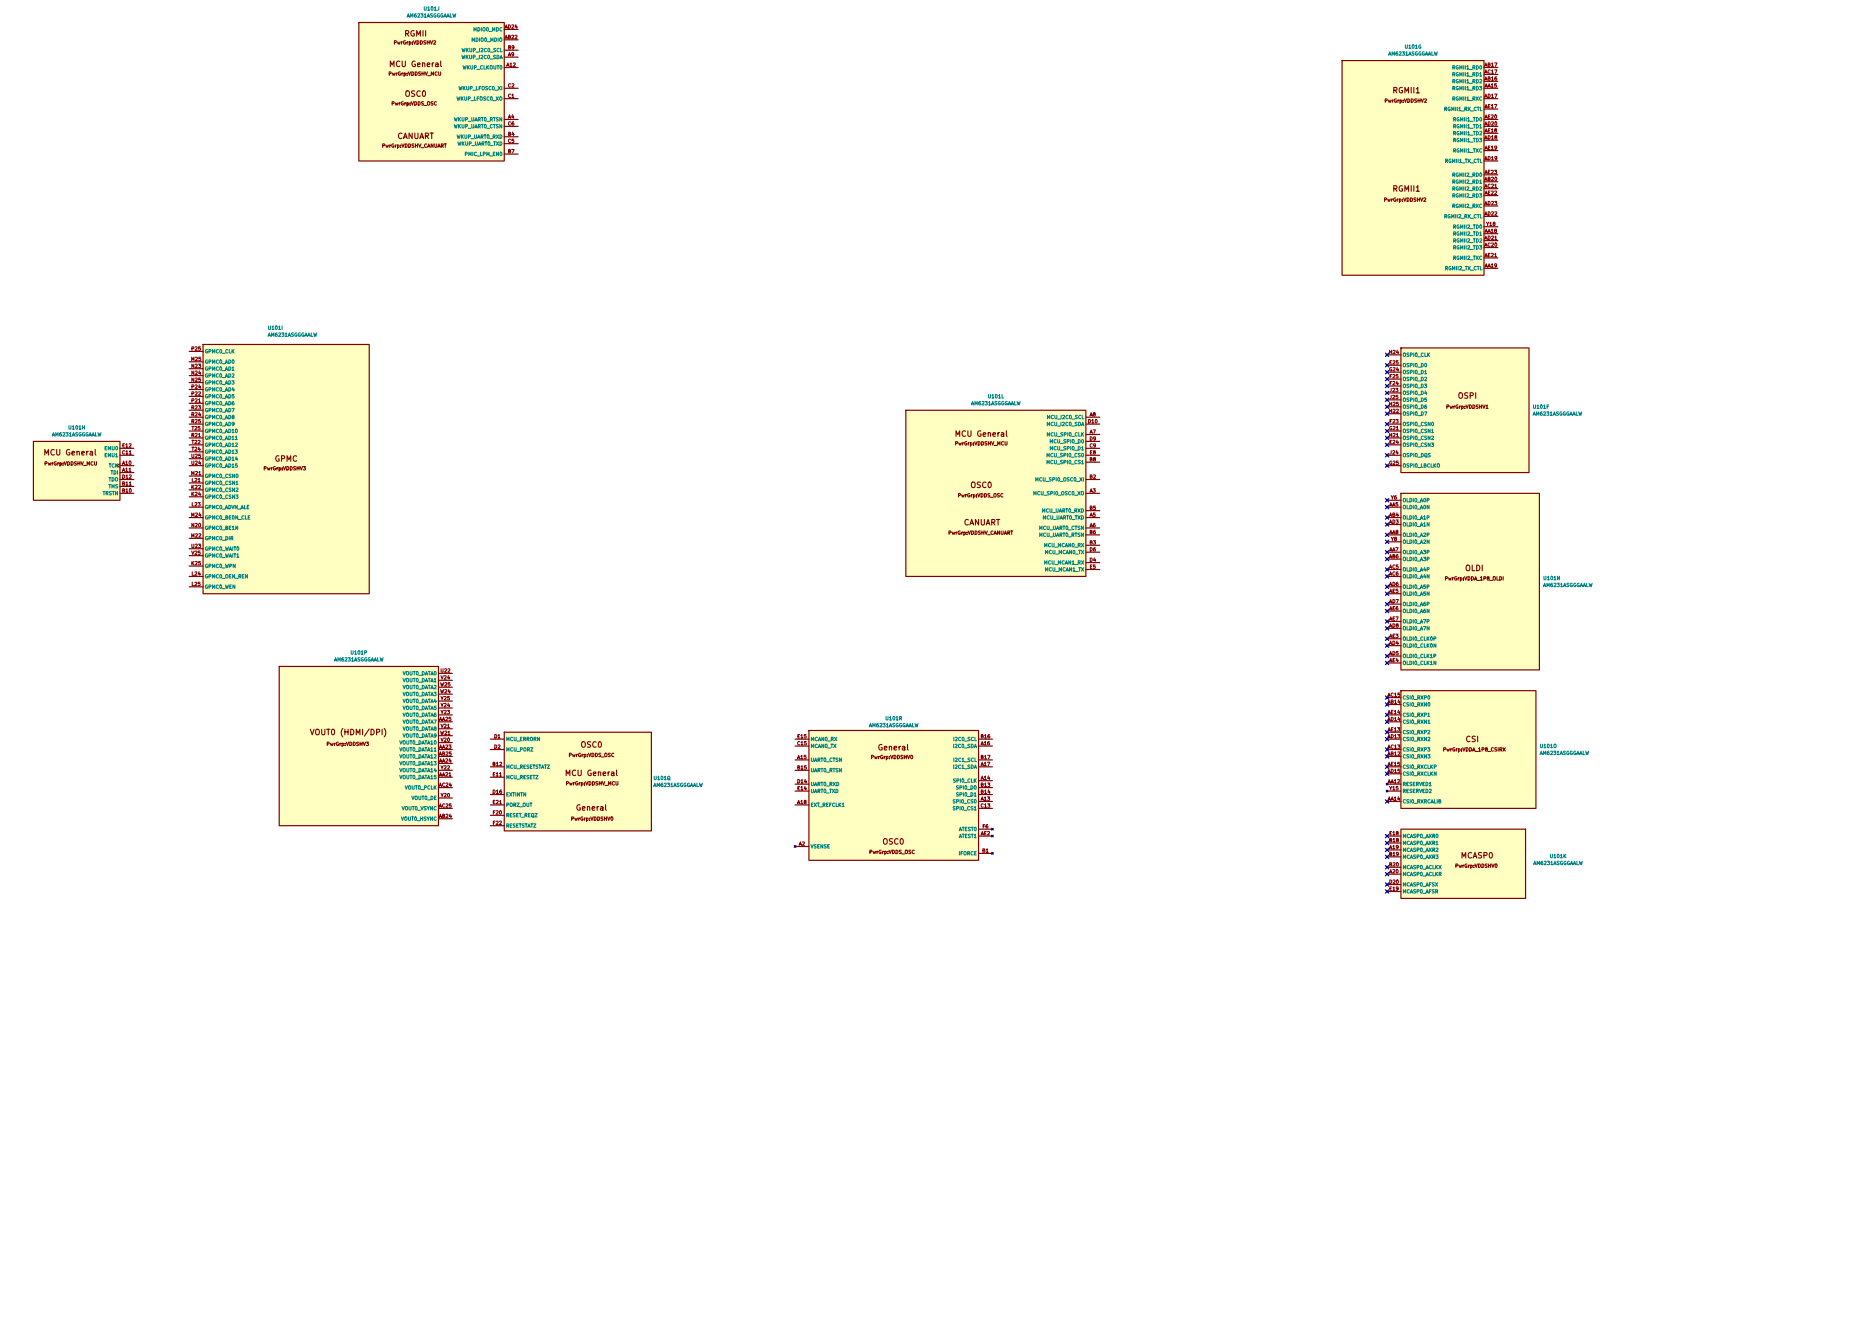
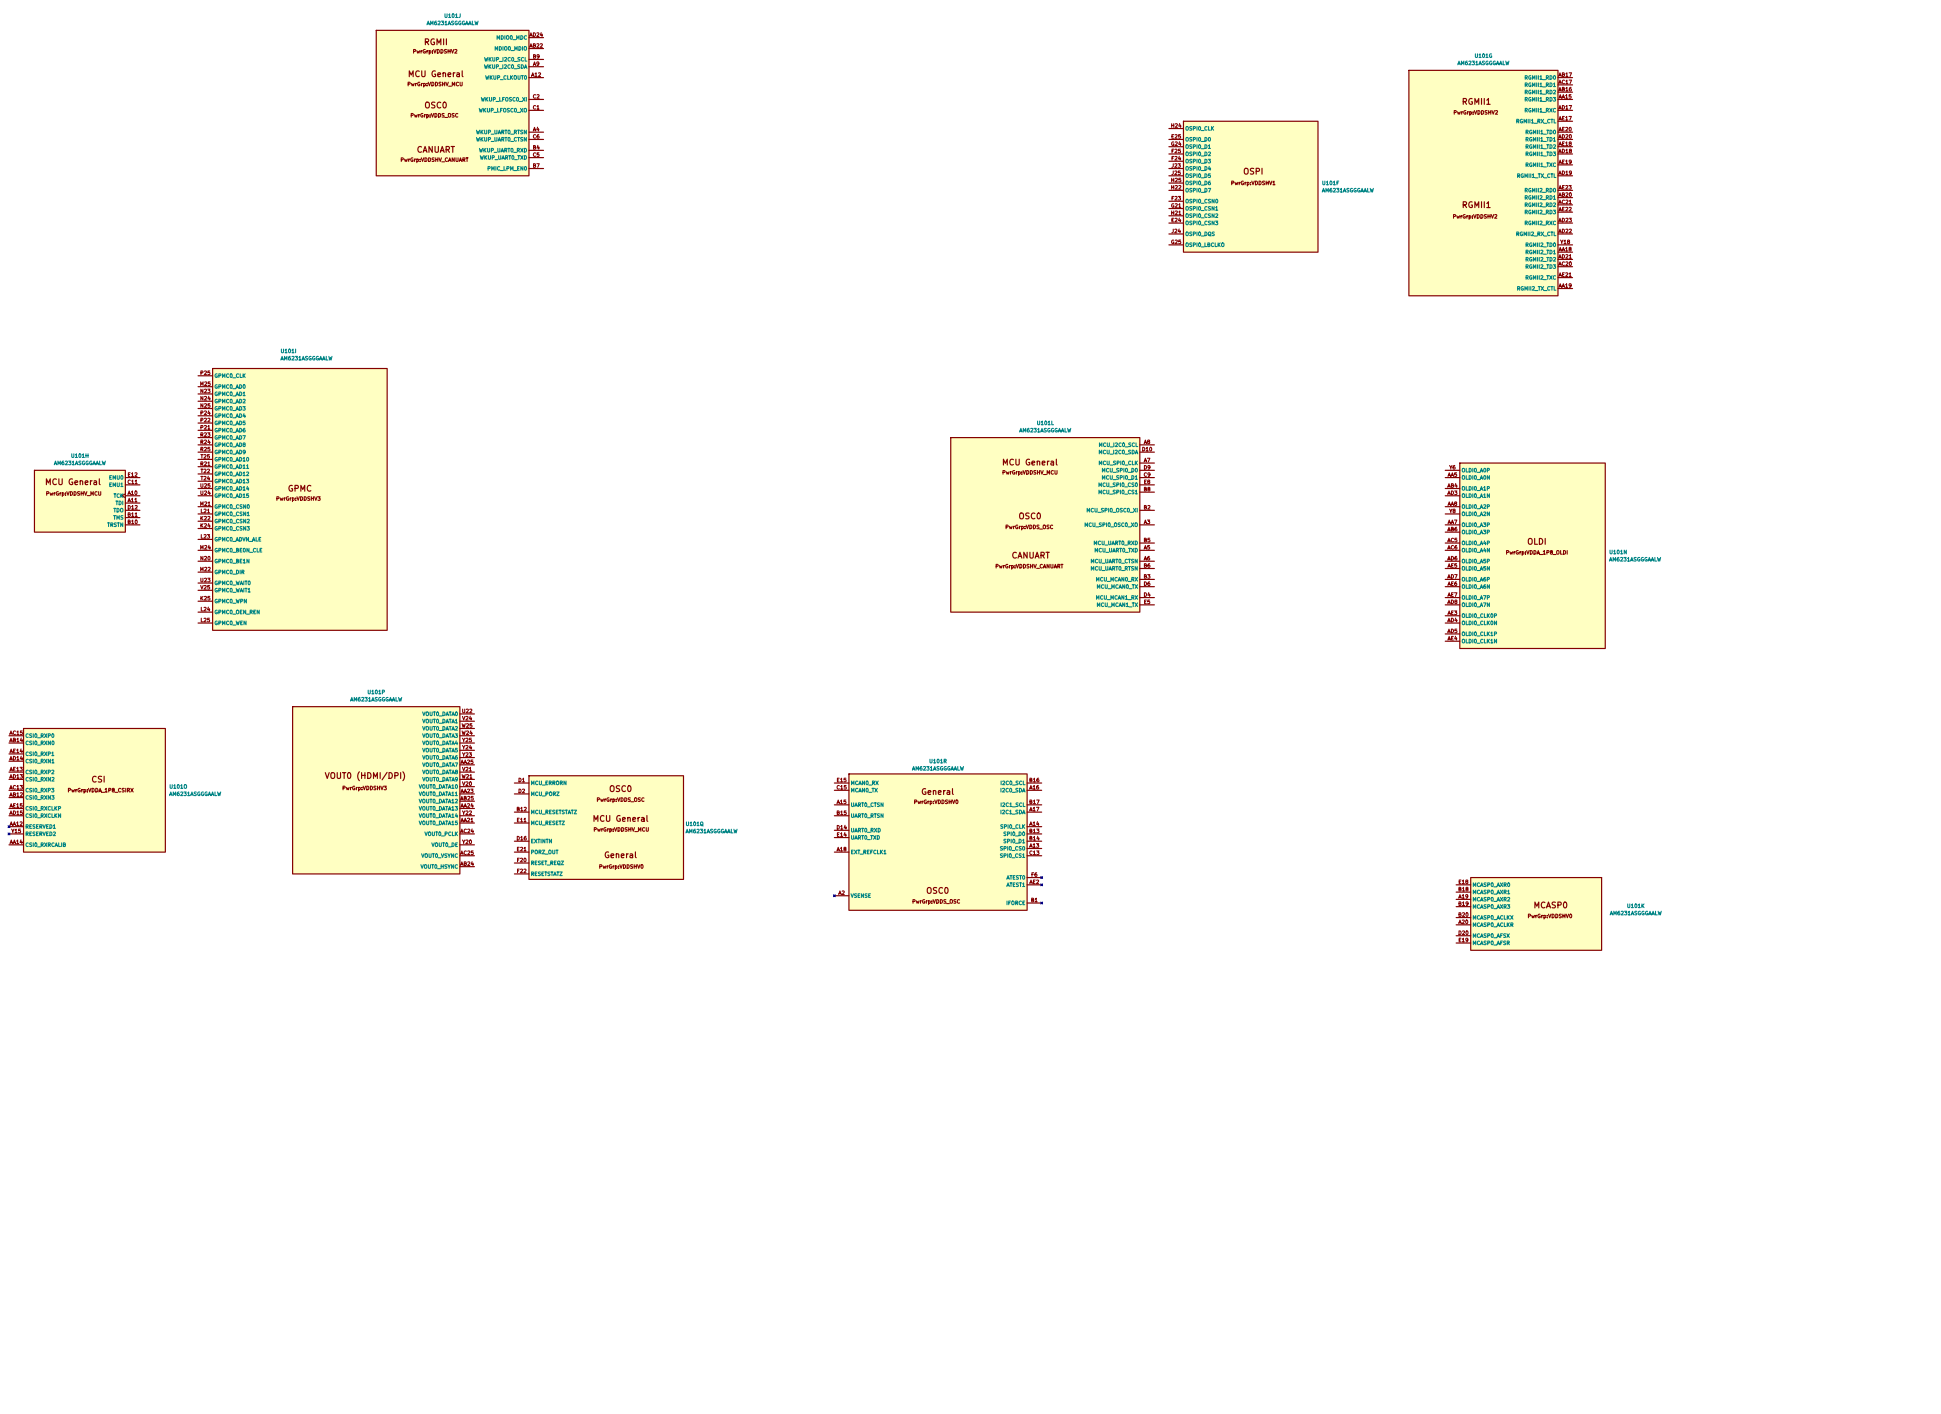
no-connect mark: (1387, 354) -> none
no-connect mark: (1387, 365) -> none
no-connect mark: (1387, 372) -> none
no-connect mark: (1387, 379) -> none
no-connect mark: (1387, 386) -> none
no-connect mark: (1387, 392) -> none
no-connect mark: (1387, 399) -> none
no-connect mark: (1387, 406) -> none
part position: (1458, 410) -> (1243, 186)
no-connect mark: (1387, 413) -> none
no-connect mark: (1387, 424) -> none
no-connect mark: (1387, 431) -> none
no-connect mark: (1387, 437) -> none
no-connect mark: (1387, 444) -> none
no-connect mark: (1387, 455) -> none
no-connect mark: (1387, 465) -> none
no-connect mark: (1387, 500) -> none
no-connect mark: (1387, 507) -> none
no-connect mark: (1387, 517) -> none
no-connect mark: (1387, 524) -> none
no-connect mark: (1387, 534) -> none
no-connect mark: (1387, 541) -> none
no-connect mark: (1387, 552) -> none
no-connect mark: (1387, 559) -> none
no-connect mark: (1387, 569) -> none
no-connect mark: (1387, 576) -> none
part position: (1463, 581) -> (1525, 555)
no-connect mark: (1387, 586) -> none
no-connect mark: (1387, 593) -> none
no-connect mark: (1387, 604) -> none
no-connect mark: (1387, 611) -> none
no-connect mark: (1387, 621) -> none
no-connect mark: (1387, 628) -> none
no-connect mark: (1387, 638) -> none
no-connect mark: (1387, 645) -> none
no-connect mark: (1387, 656) -> none
no-connect mark: (1387, 662) -> none
no-connect mark: (1387, 697) -> none
no-connect mark: (1387, 704) -> none
no-connect mark: (1387, 714) -> none
no-connect mark: (1387, 721) -> none
no-connect mark: (1387, 732) -> none
no-connect mark: (1387, 739) -> none
no-connect mark: (1387, 749) -> none
part position: (1461, 749) -> (86, 790)
no-connect mark: (1387, 756) -> none
no-connect mark: (1387, 766) -> none
no-connect mark: (1387, 773) -> none
no-connect mark: (1387, 801) -> none
no-connect mark: (1387, 836) -> none
no-connect mark: (1387, 843) -> none
no-connect mark: (1387, 849) -> none
no-connect mark: (1387, 856) -> none
no-connect mark: (1387, 867) -> none
no-connect mark: (1387, 874) -> none
no-connect mark: (1387, 884) -> none
no-connect mark: (1387, 891) -> none

